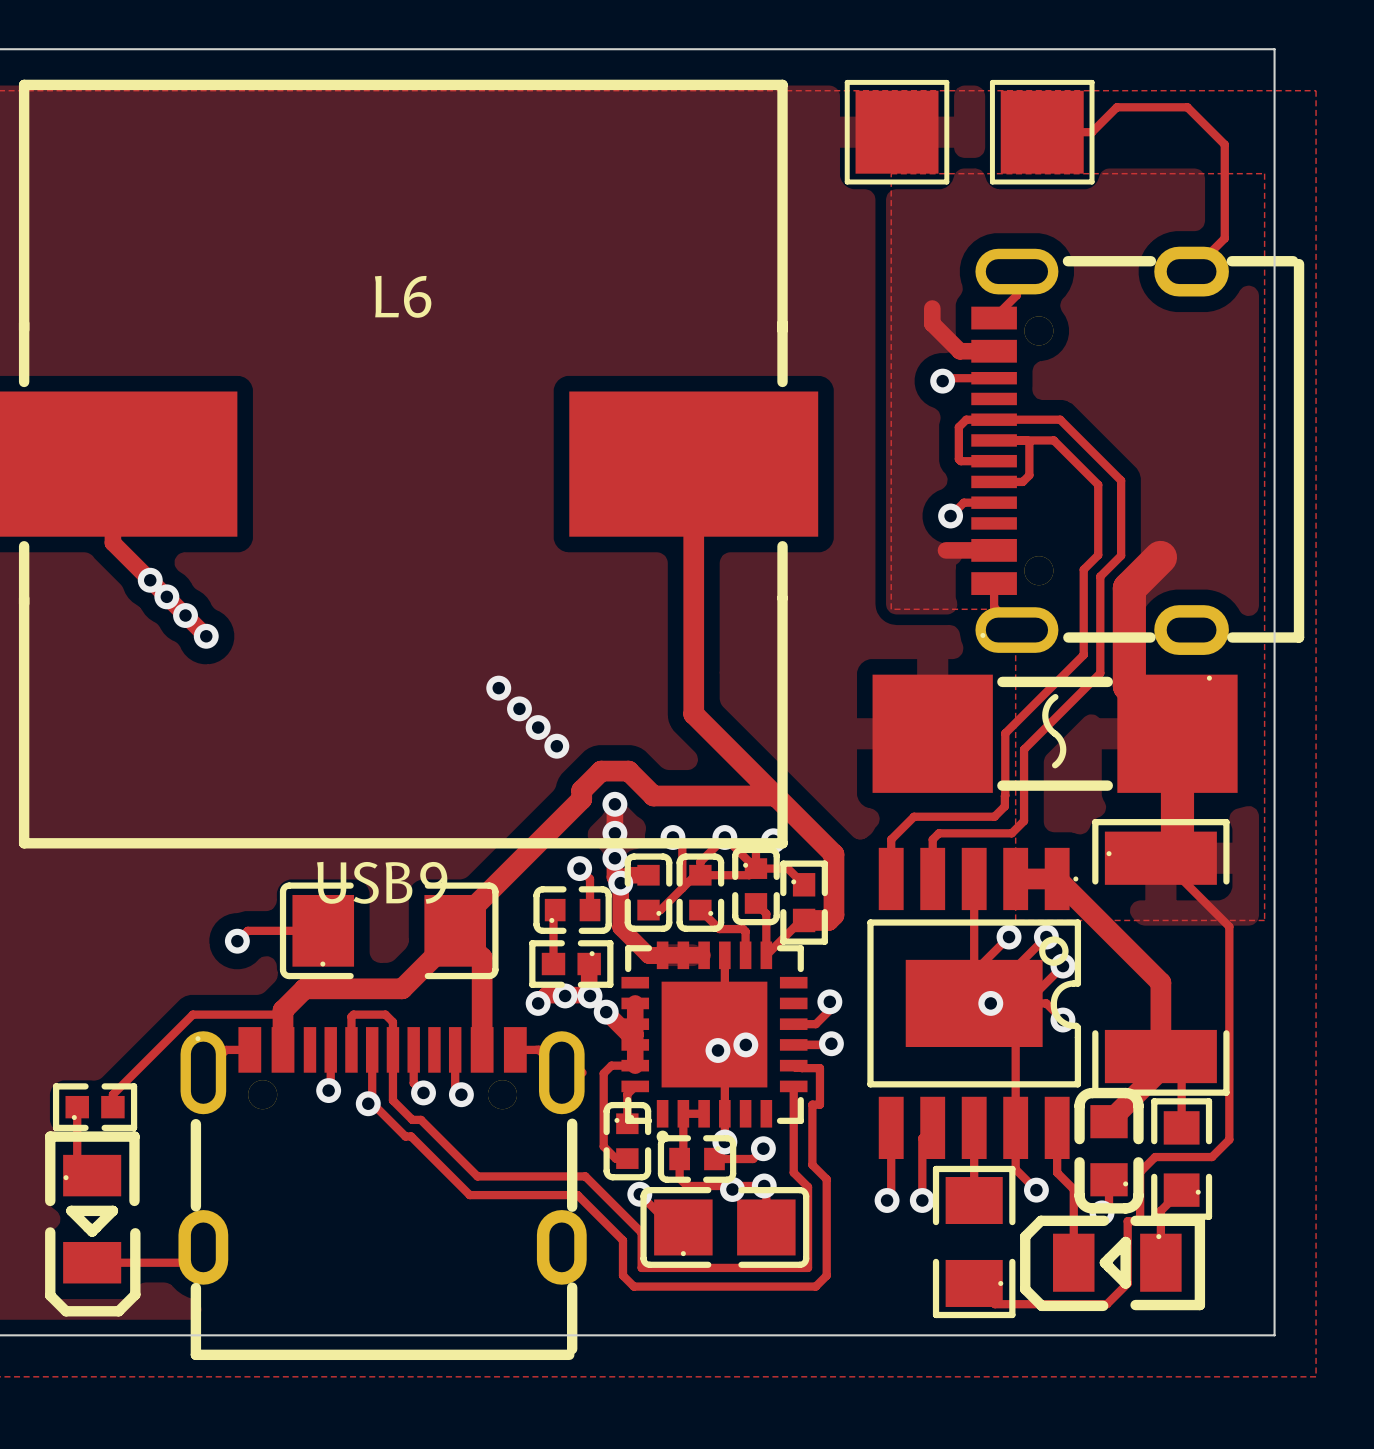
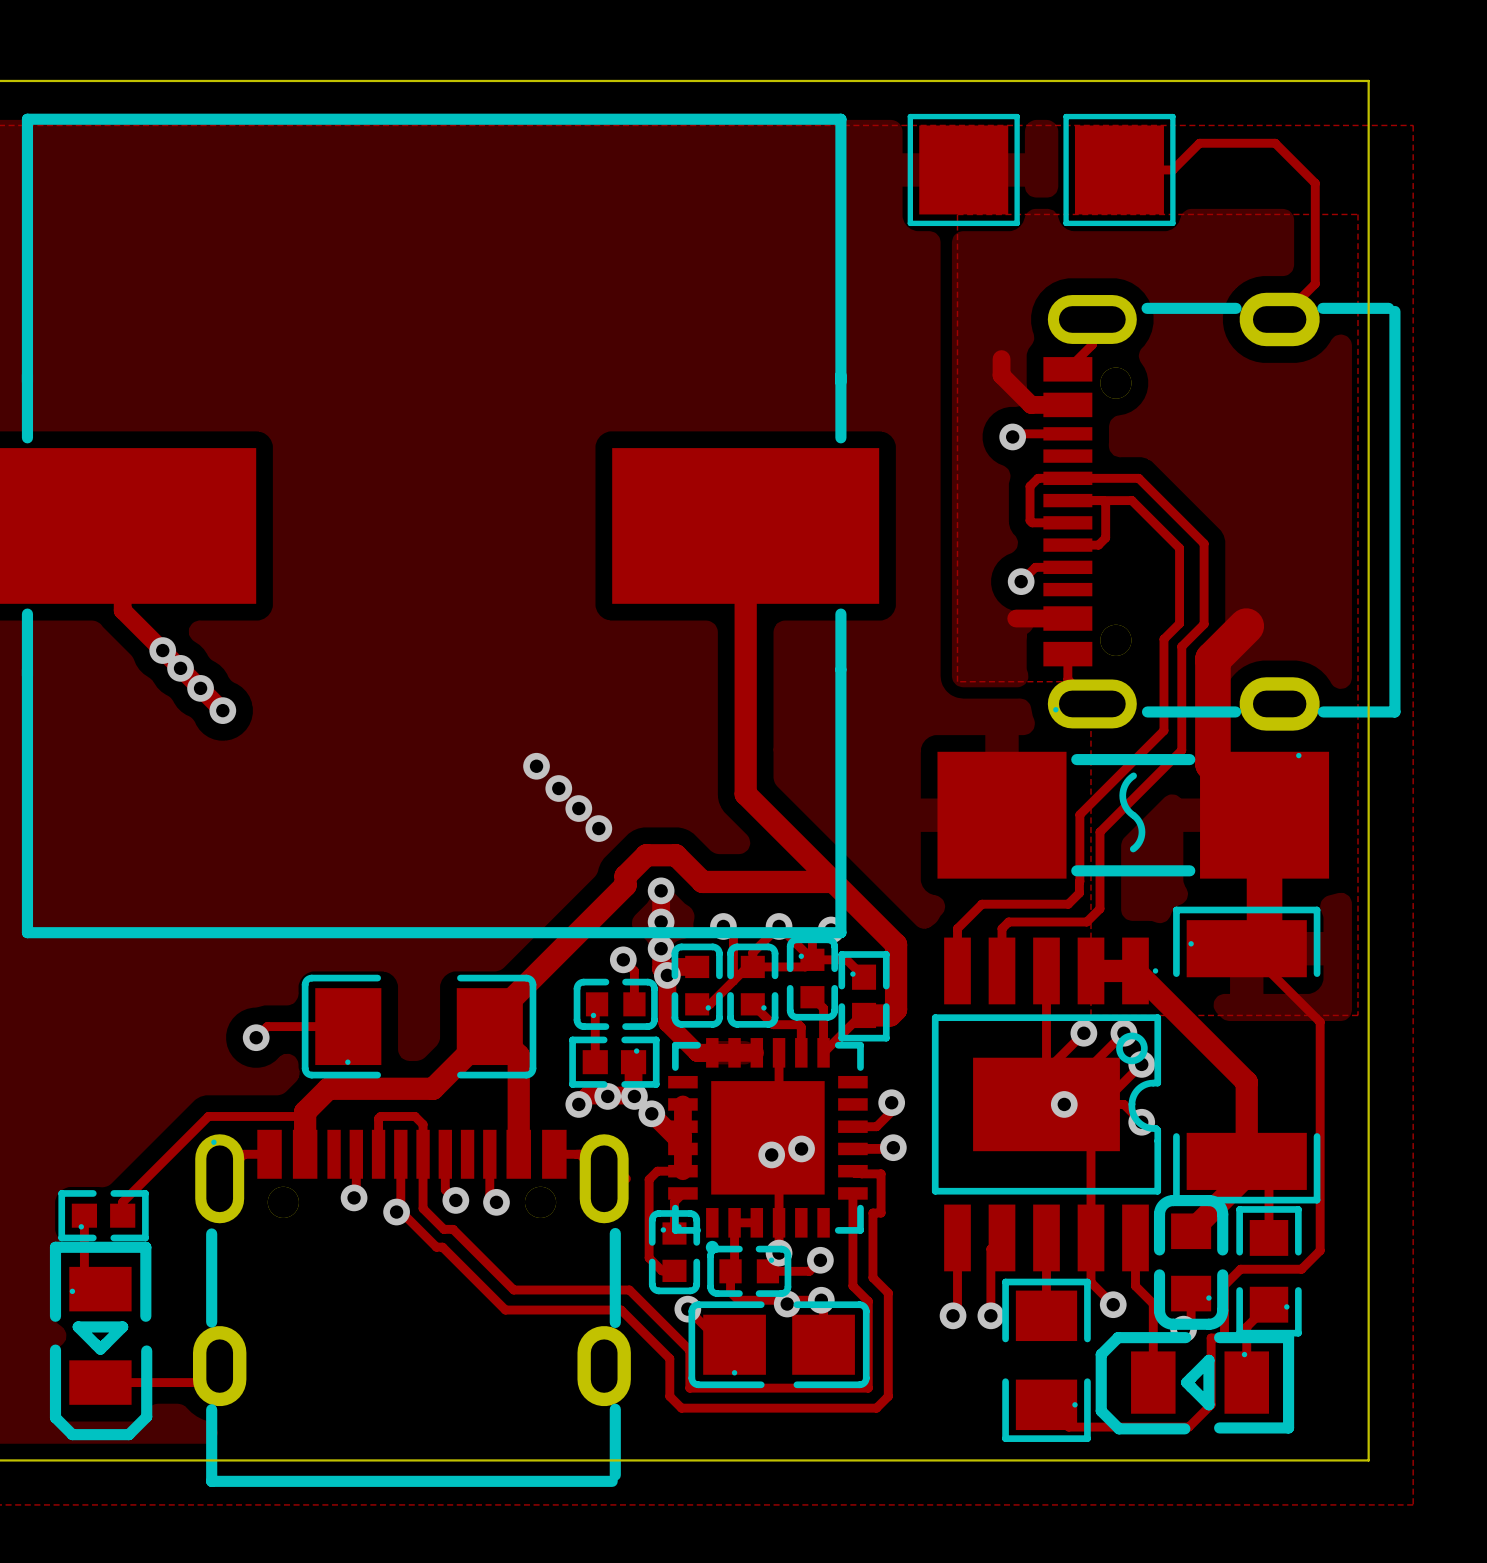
L6 name: L6 (403, 296) -> none
USB9 name: USB9 (382, 882) -> none

